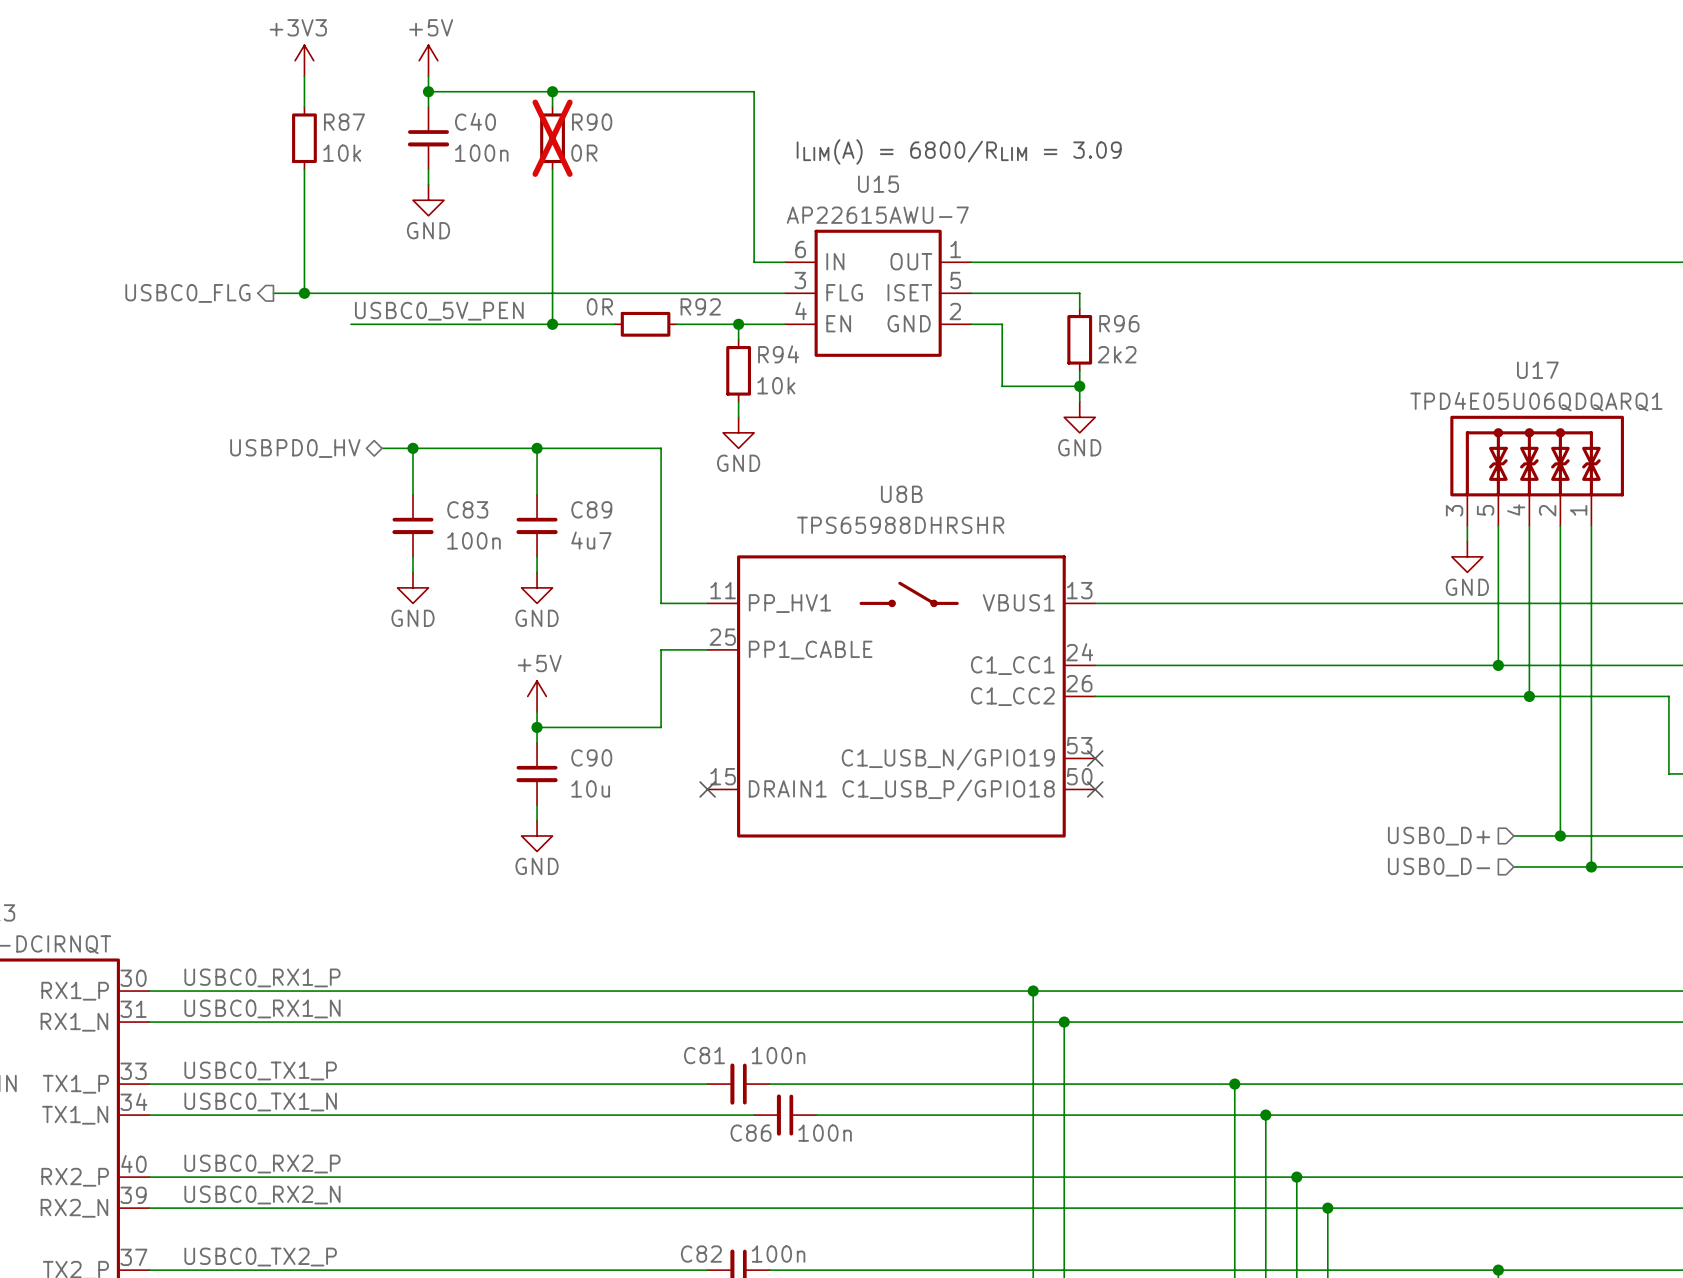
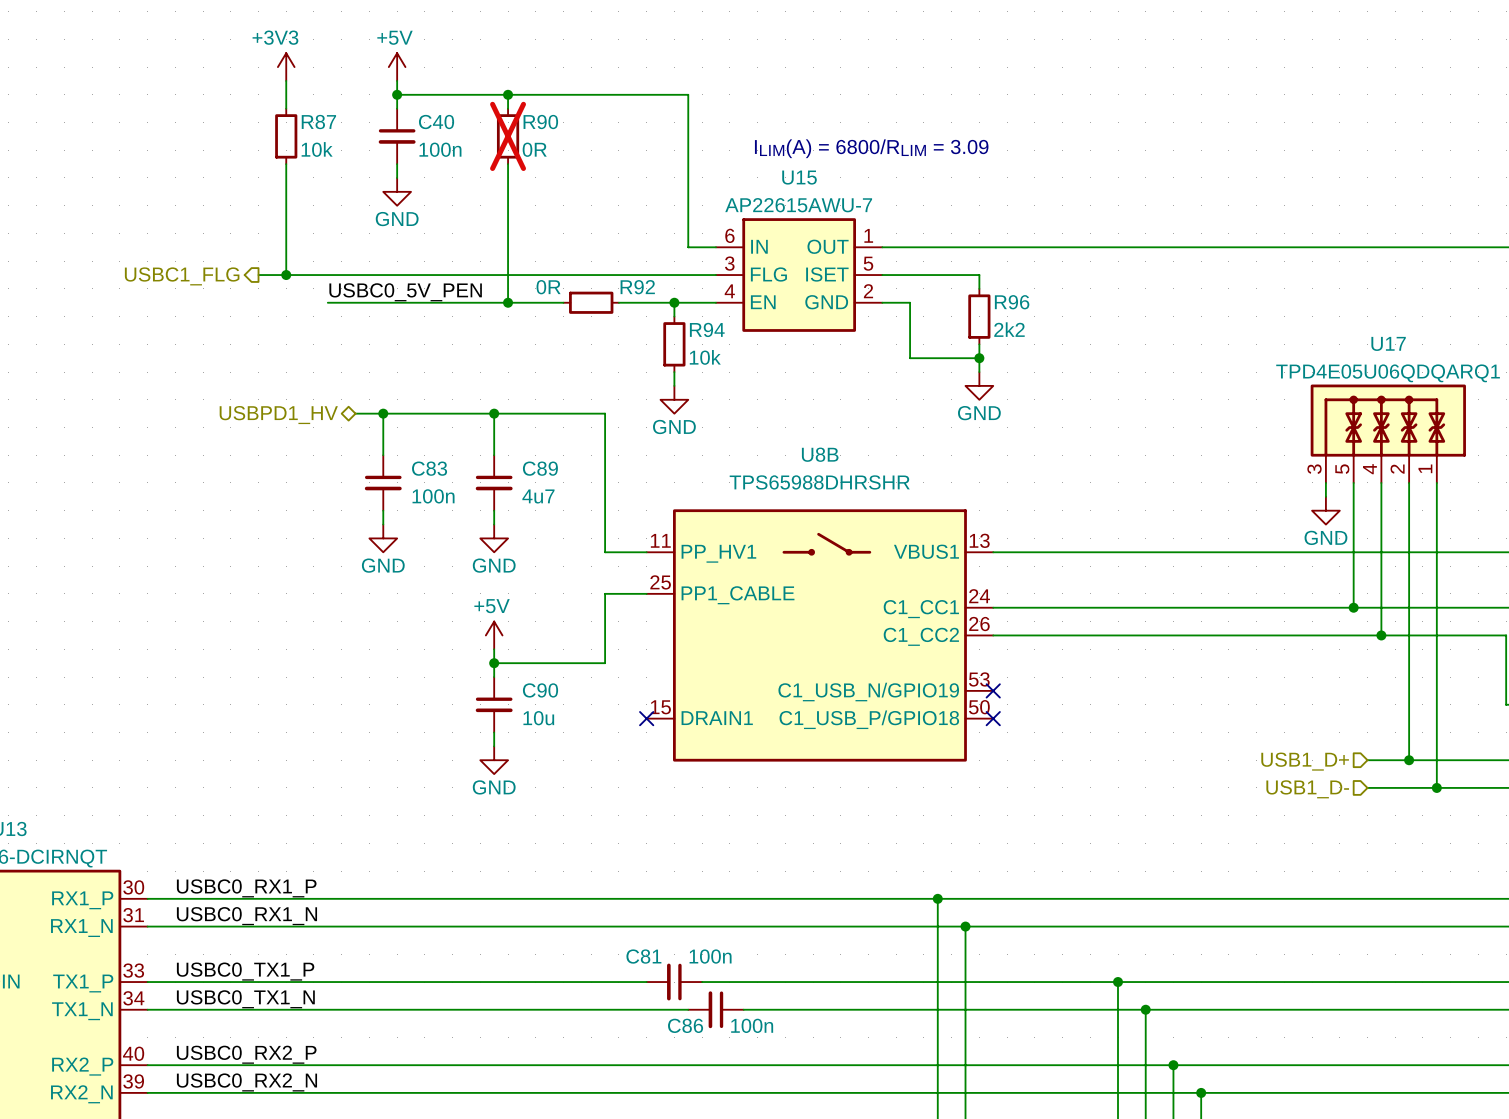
hierarchical label: USBC0_FLG (187, 293) -> USBC1_FLG (182, 276)
hierarchical label: USBPD0_HV (295, 448) -> USBPD1_HV (278, 415)
hierarchical label: USB0_D+ (1439, 836) -> USB1_D+ (1305, 761)
hierarchical label: USB0_D- (1439, 867) -> USB1_D- (1307, 789)

